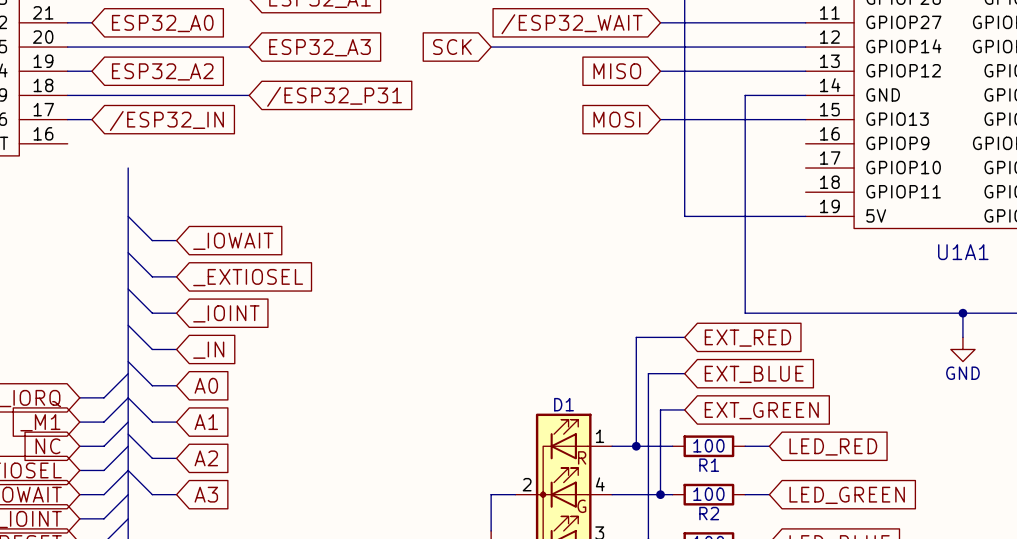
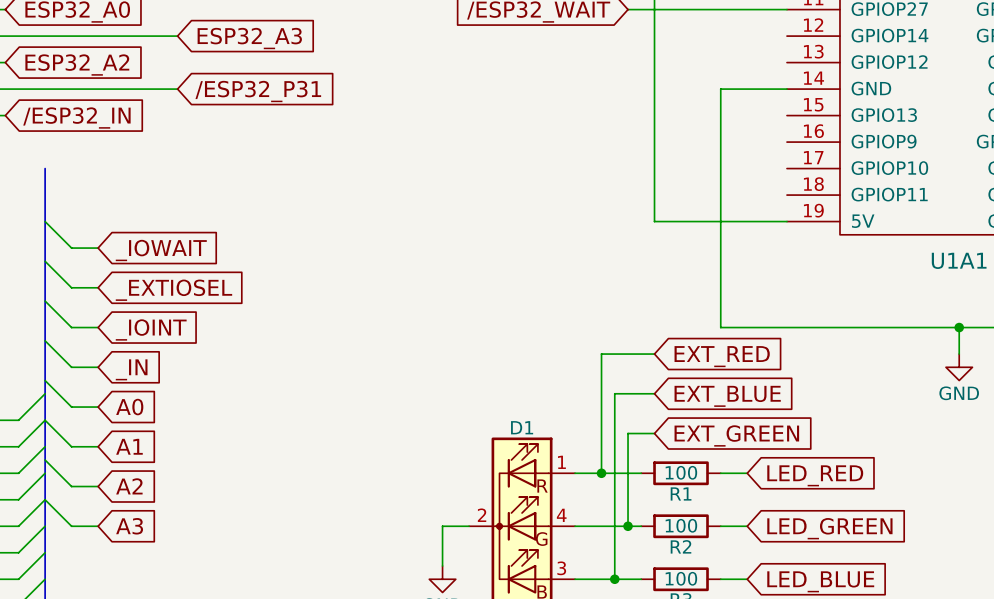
global label: SCK (452, 47) -> none
wire: (491, 47) (805, 47) -> none
global label: MISO (617, 71) -> none
wire: (660, 71) (805, 71) -> none
global label: MOSI (616, 119) -> none
wire: (660, 119) (805, 119) -> none

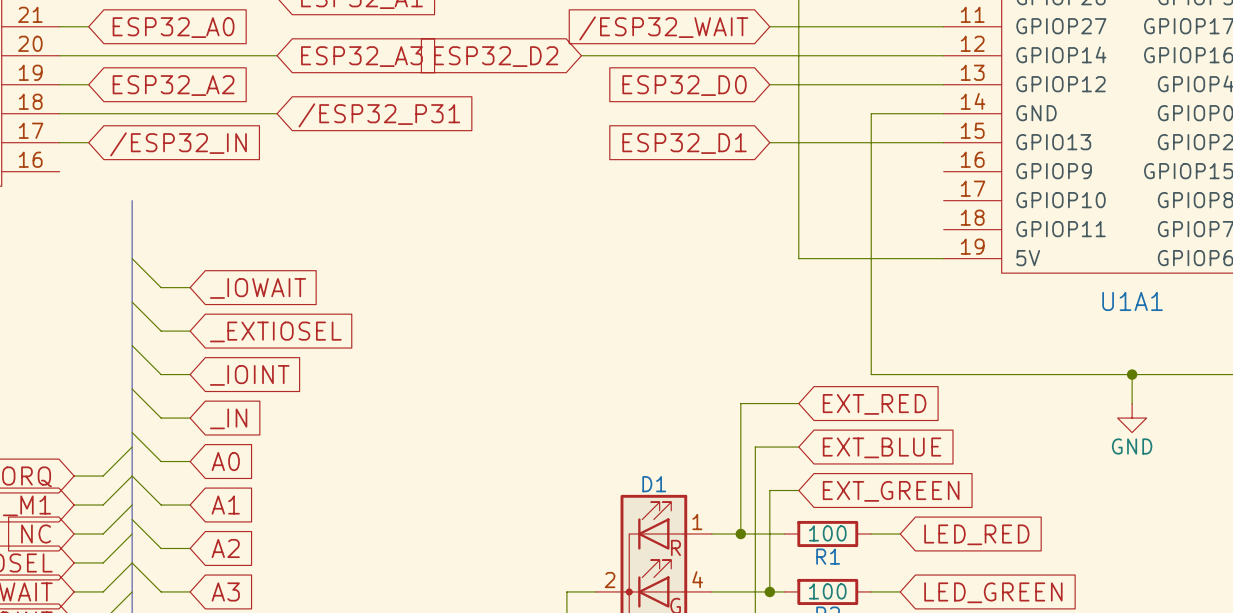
wire: none -> (581, 55) (943, 55)
global label: none -> ESP32_D2 (496, 56)
wire: none -> (769, 84) (943, 84)
global label: none -> ESP32_D0 (684, 85)
wire: none -> (769, 142) (943, 142)
global label: none -> ESP32_D1 (684, 143)

